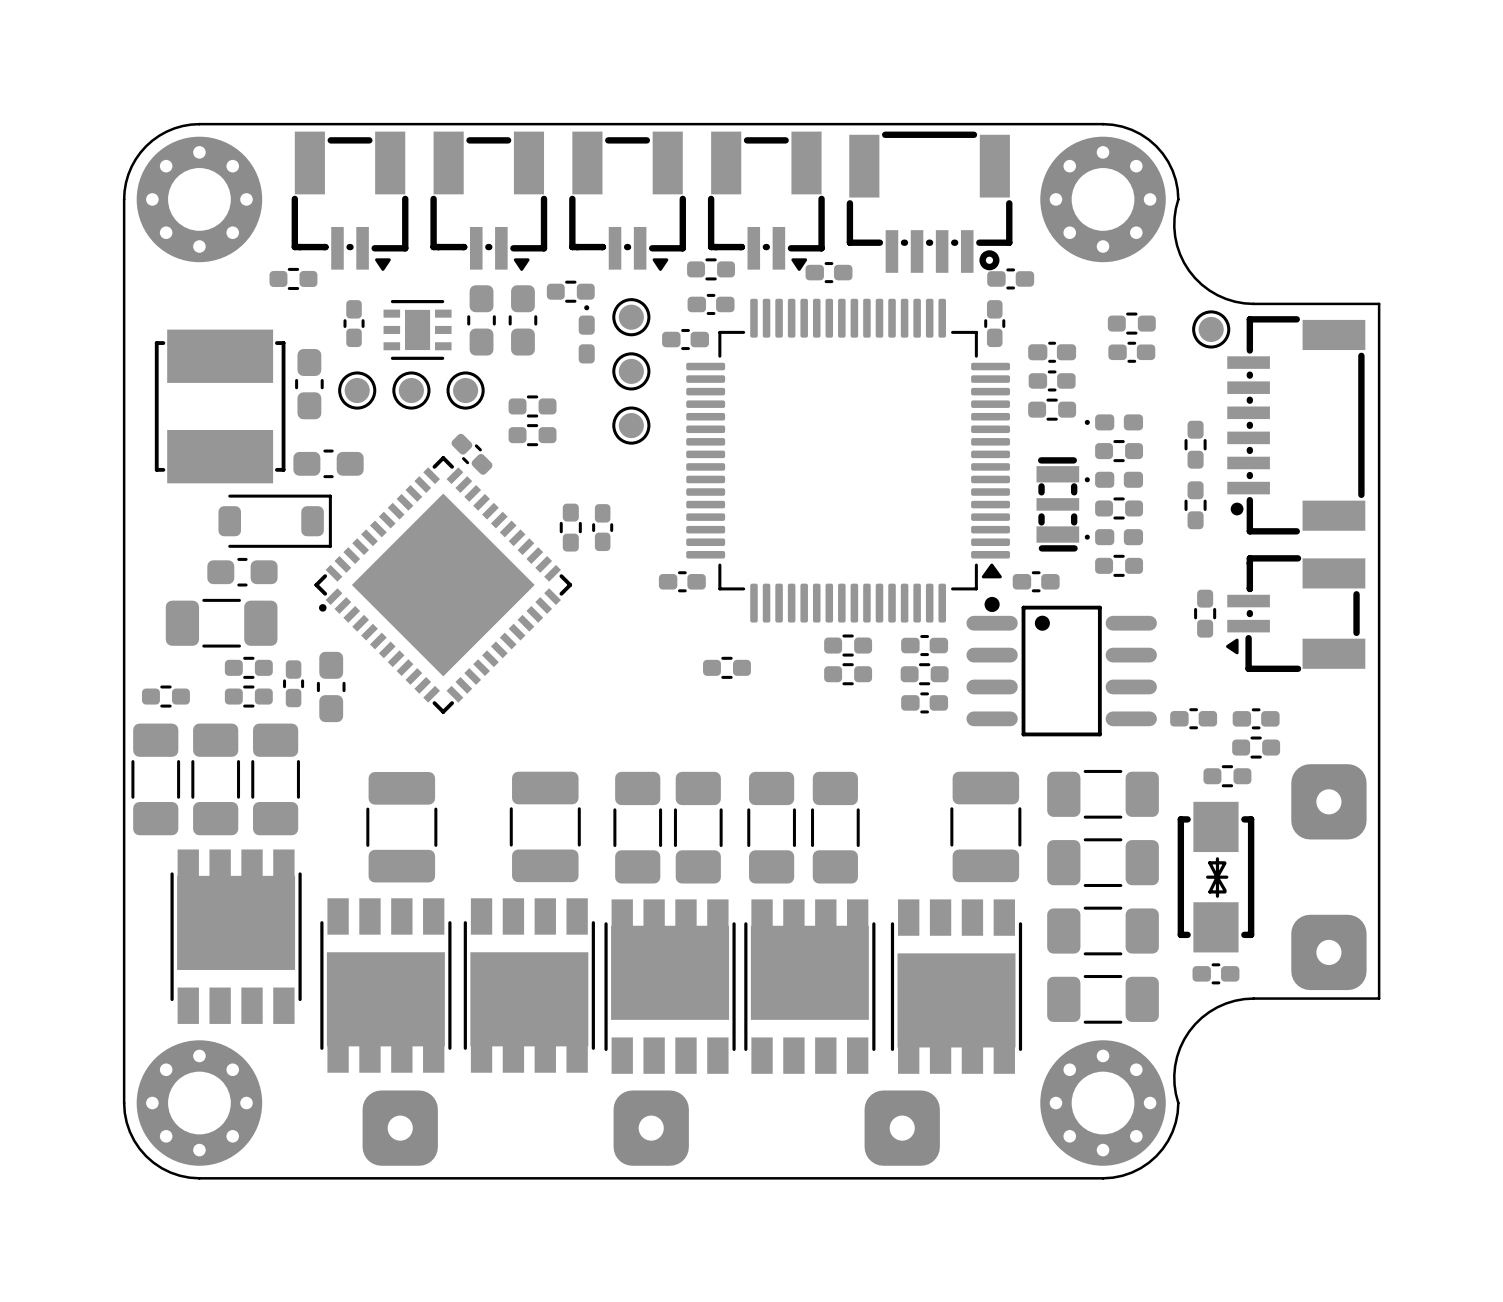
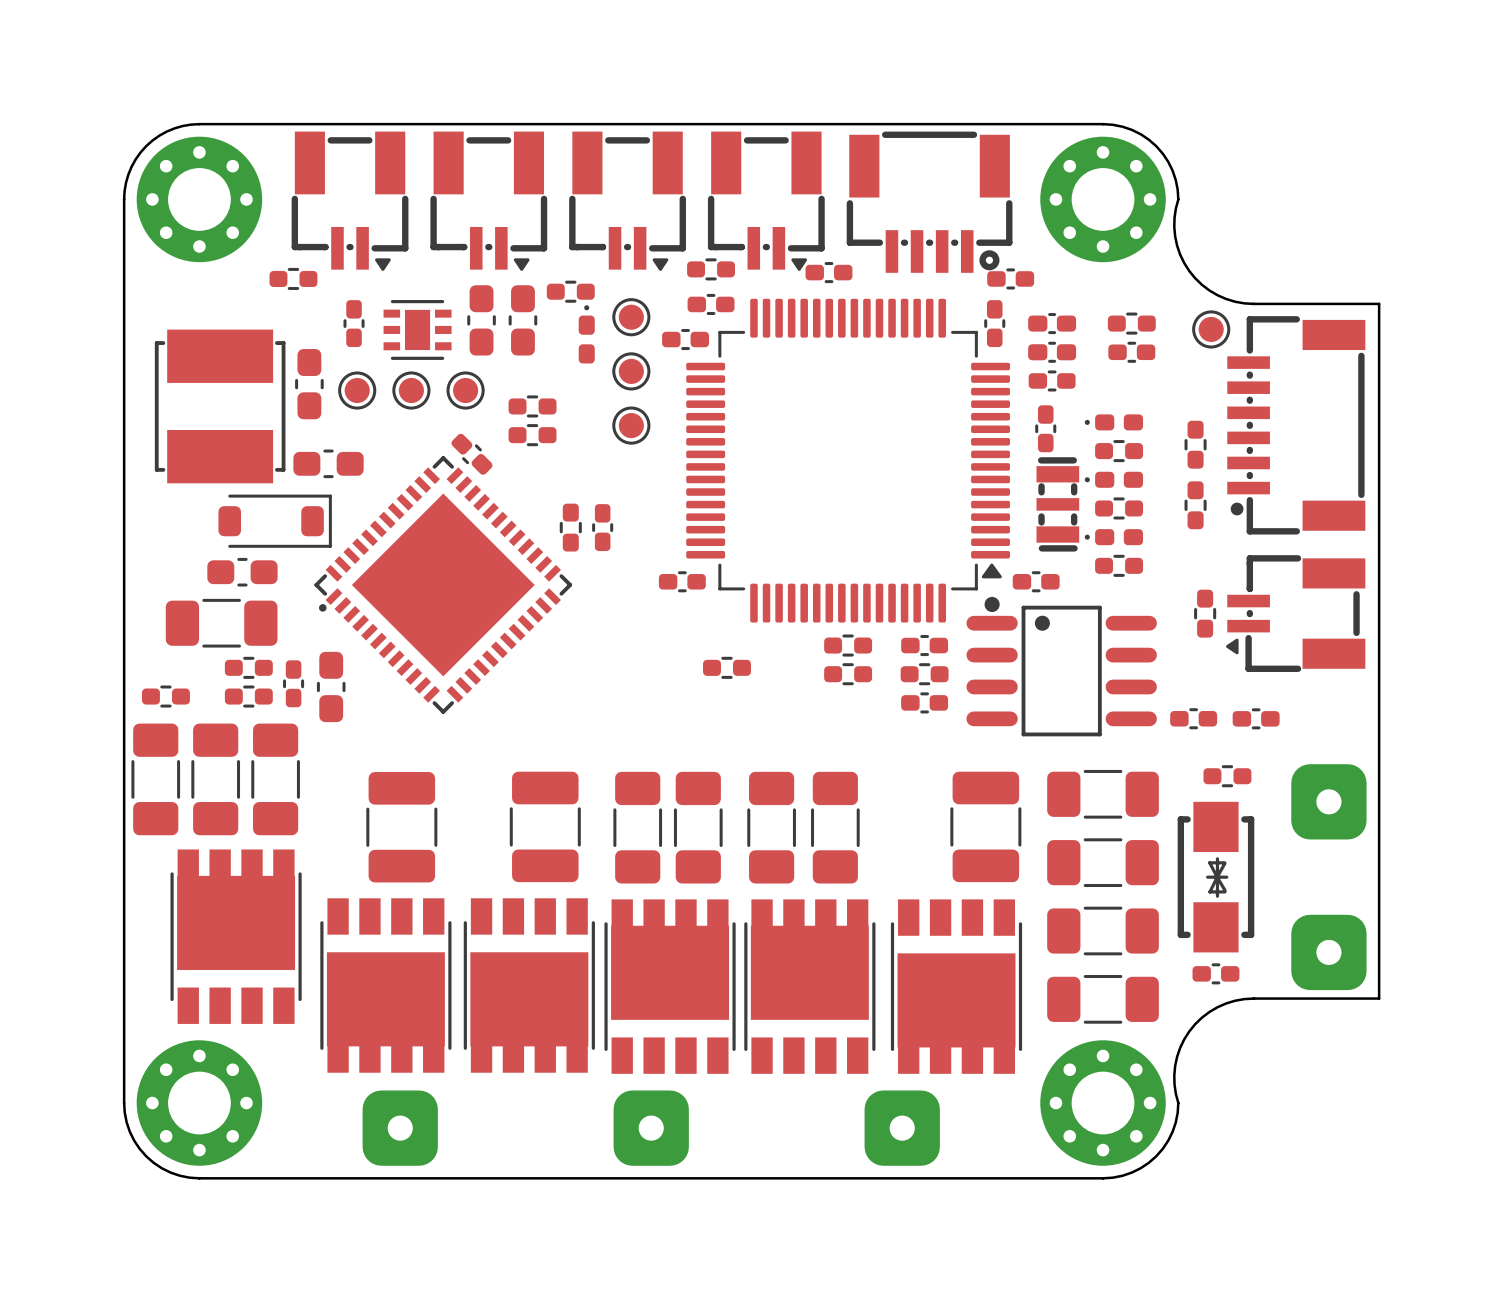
part: none -> (1052, 323)
part footprint: [1028, 398, 1077, 421] -> [1035, 405, 1057, 453]
part: (1256, 747) -> none

